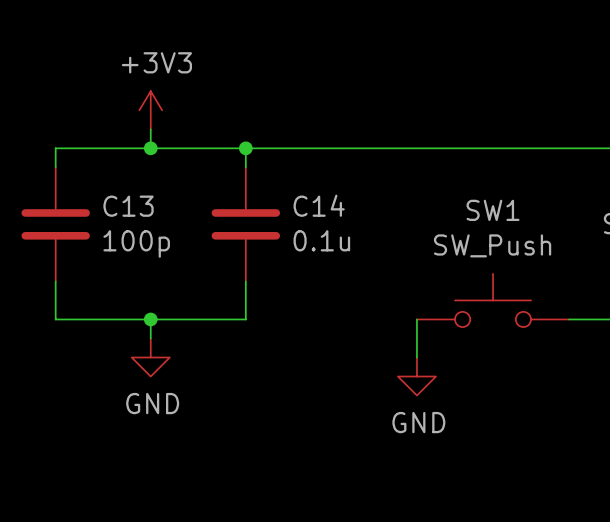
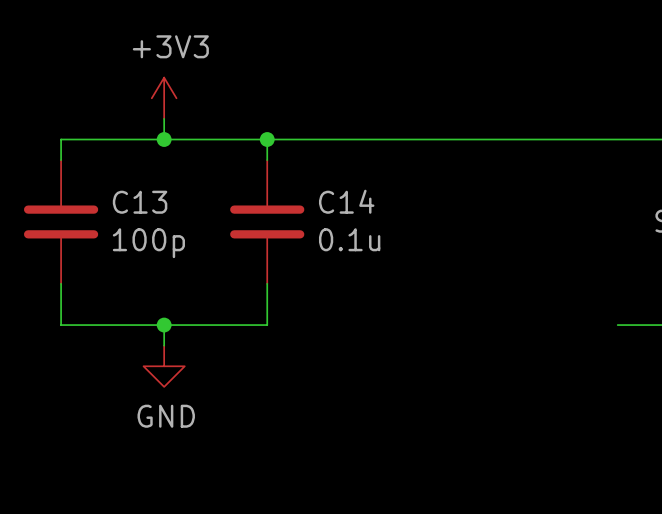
SW1: SW_Push (493, 300) -> none
wire: (416, 319) (416, 357) -> none
power symbol: GND (416, 376) -> none

